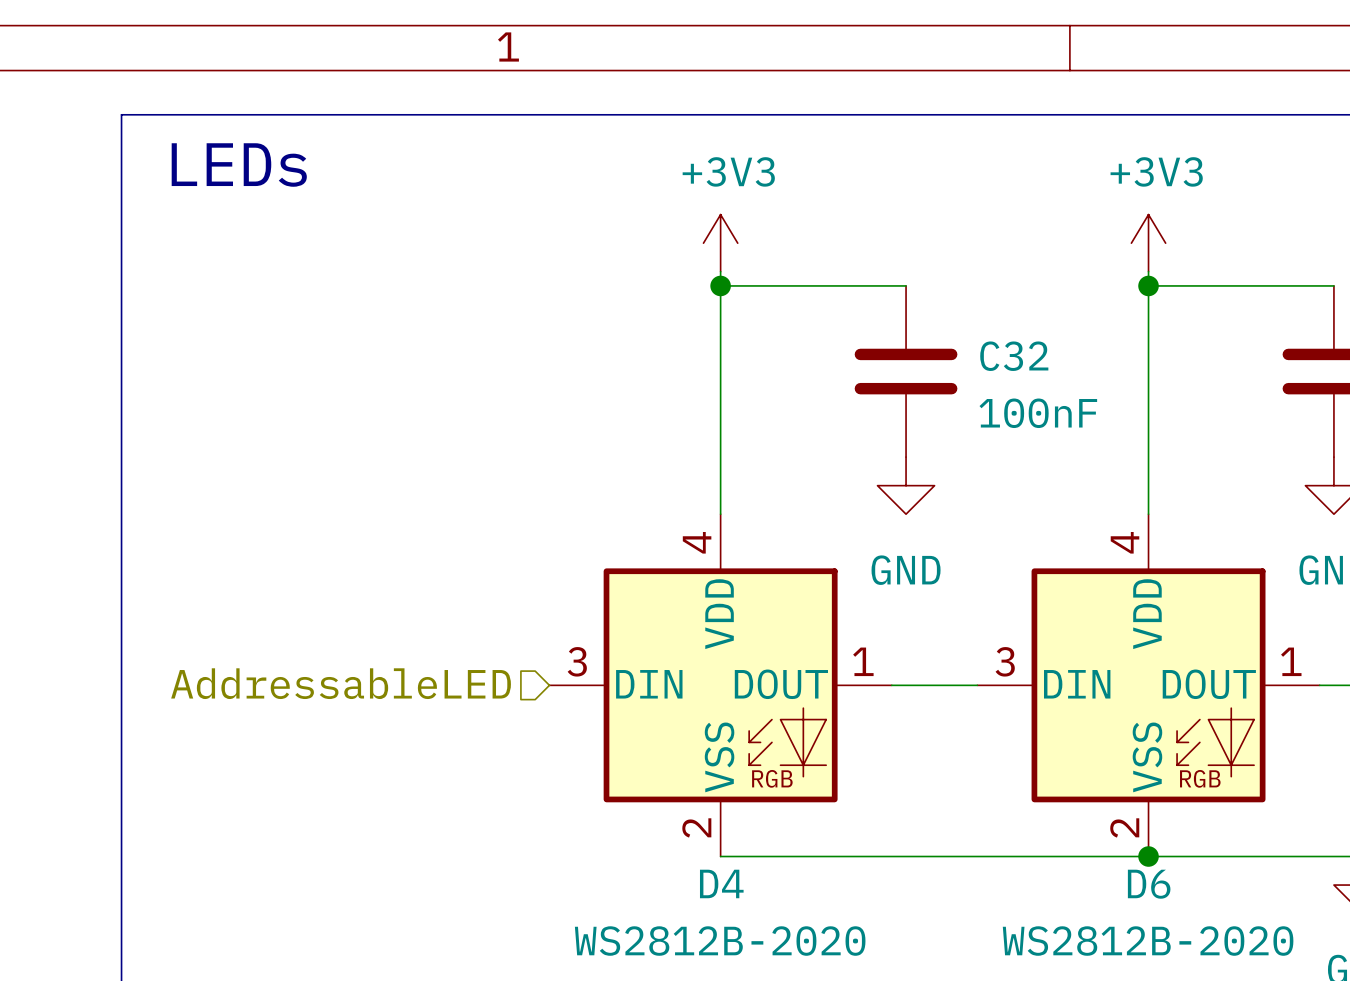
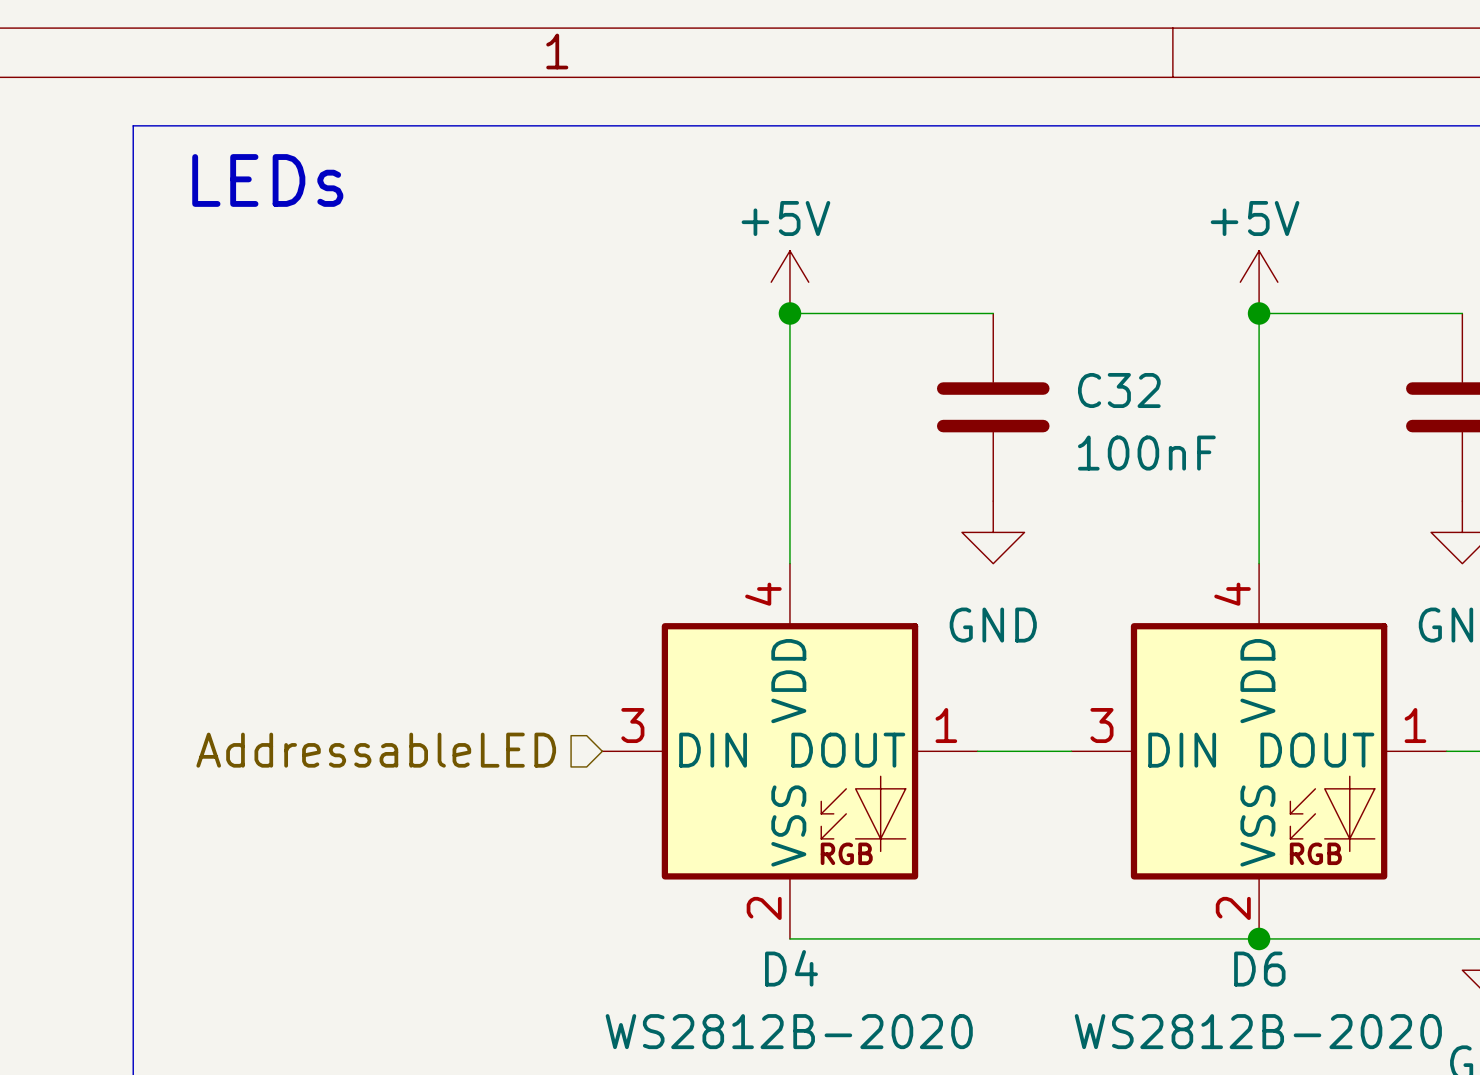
power symbol: +3V3 (720, 243) -> +5V (789, 282)
power symbol: +3V3 (1148, 243) -> +5V (1259, 282)

